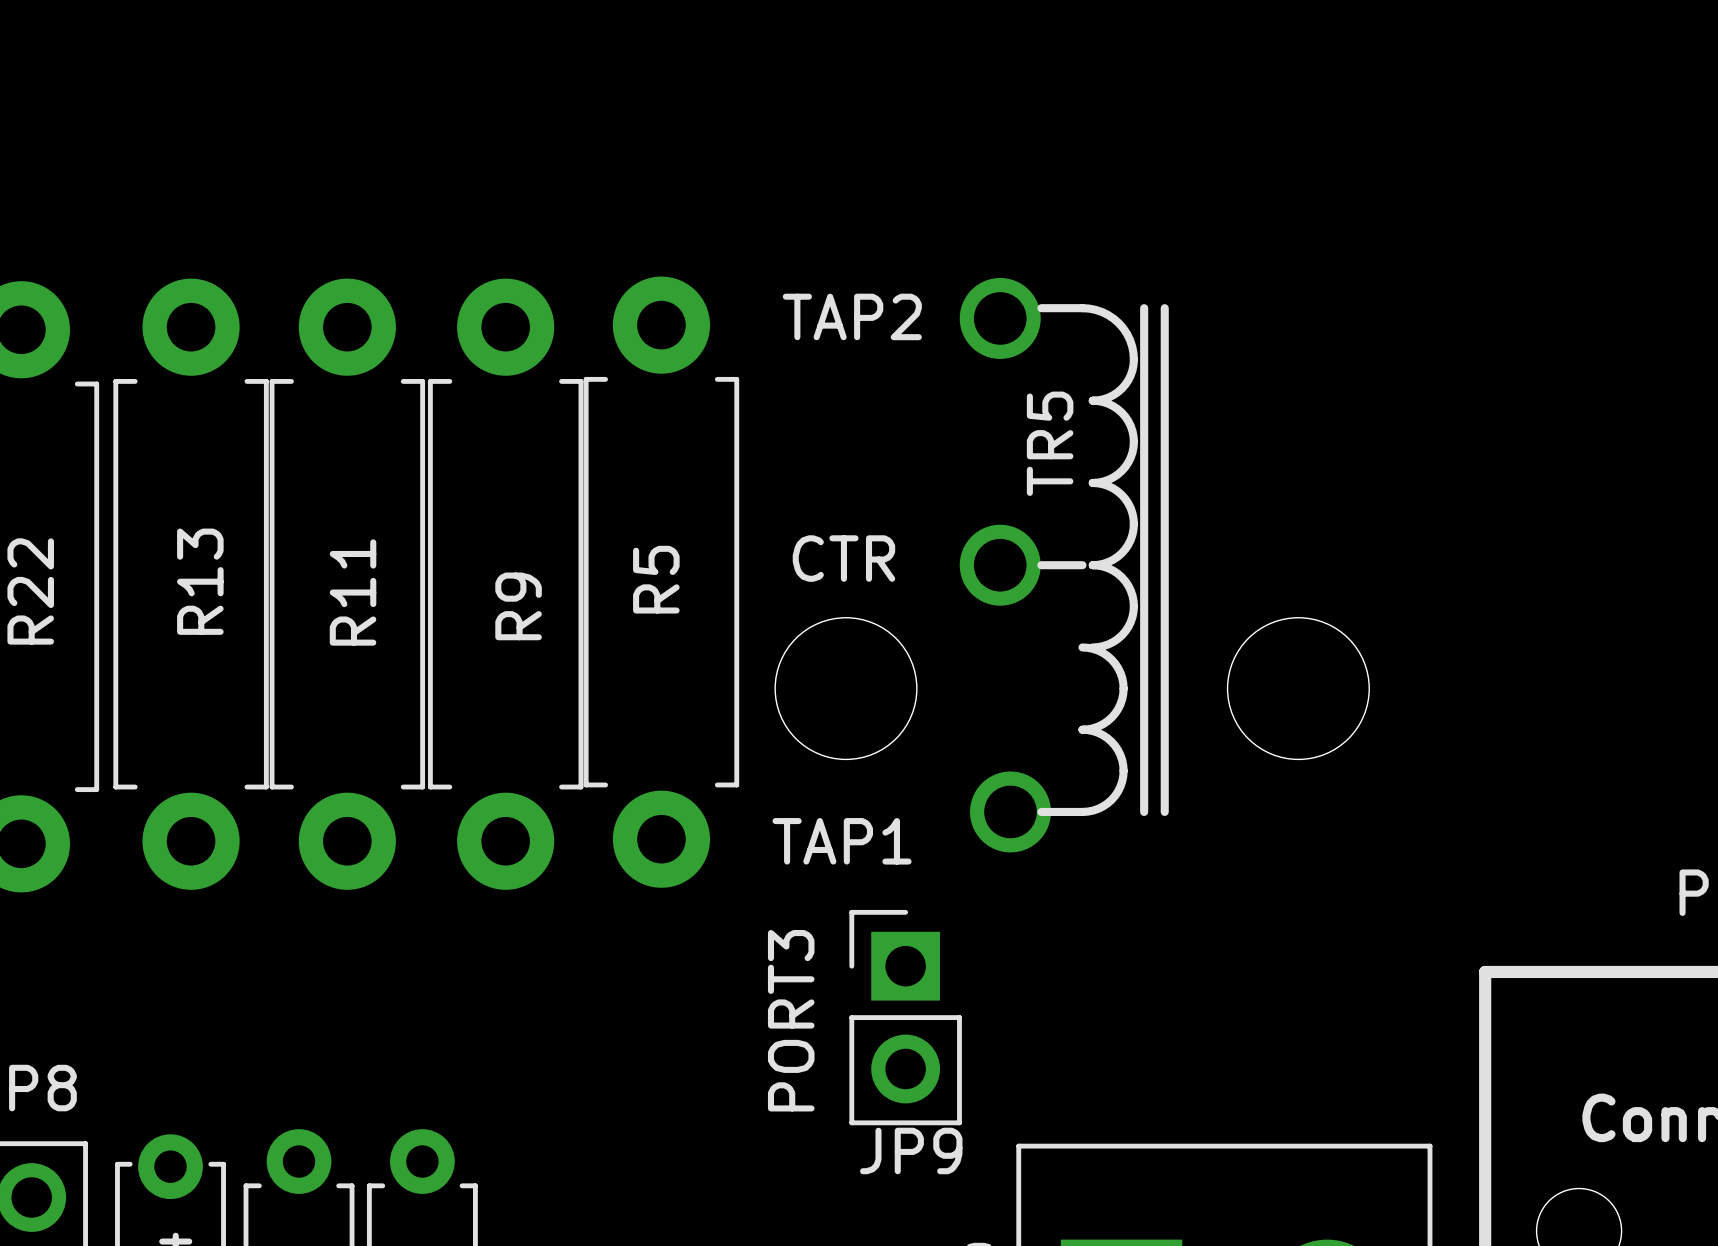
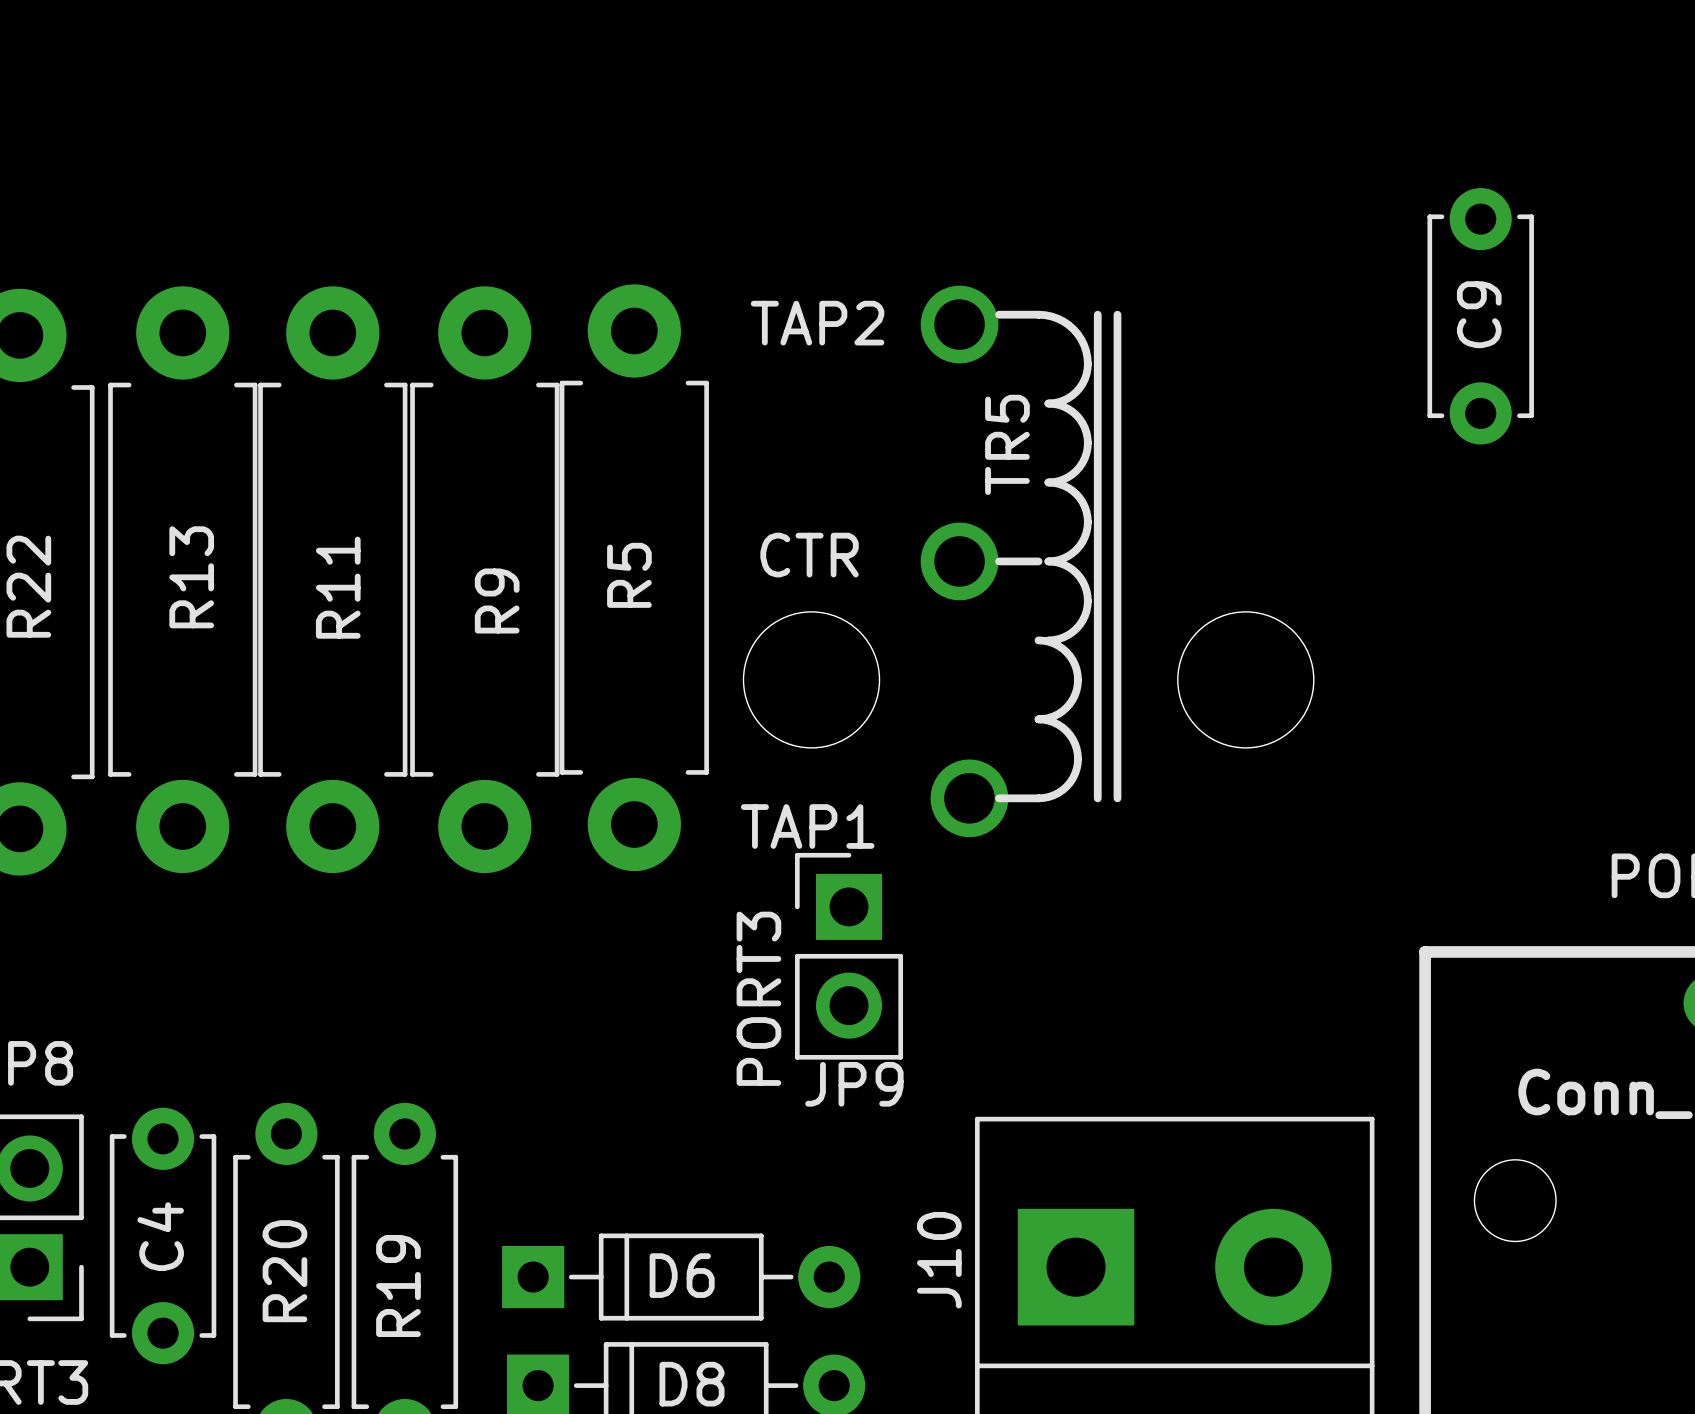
C9: none -> (1480, 316)
JP9 position: (905, 1017) -> (849, 956)

